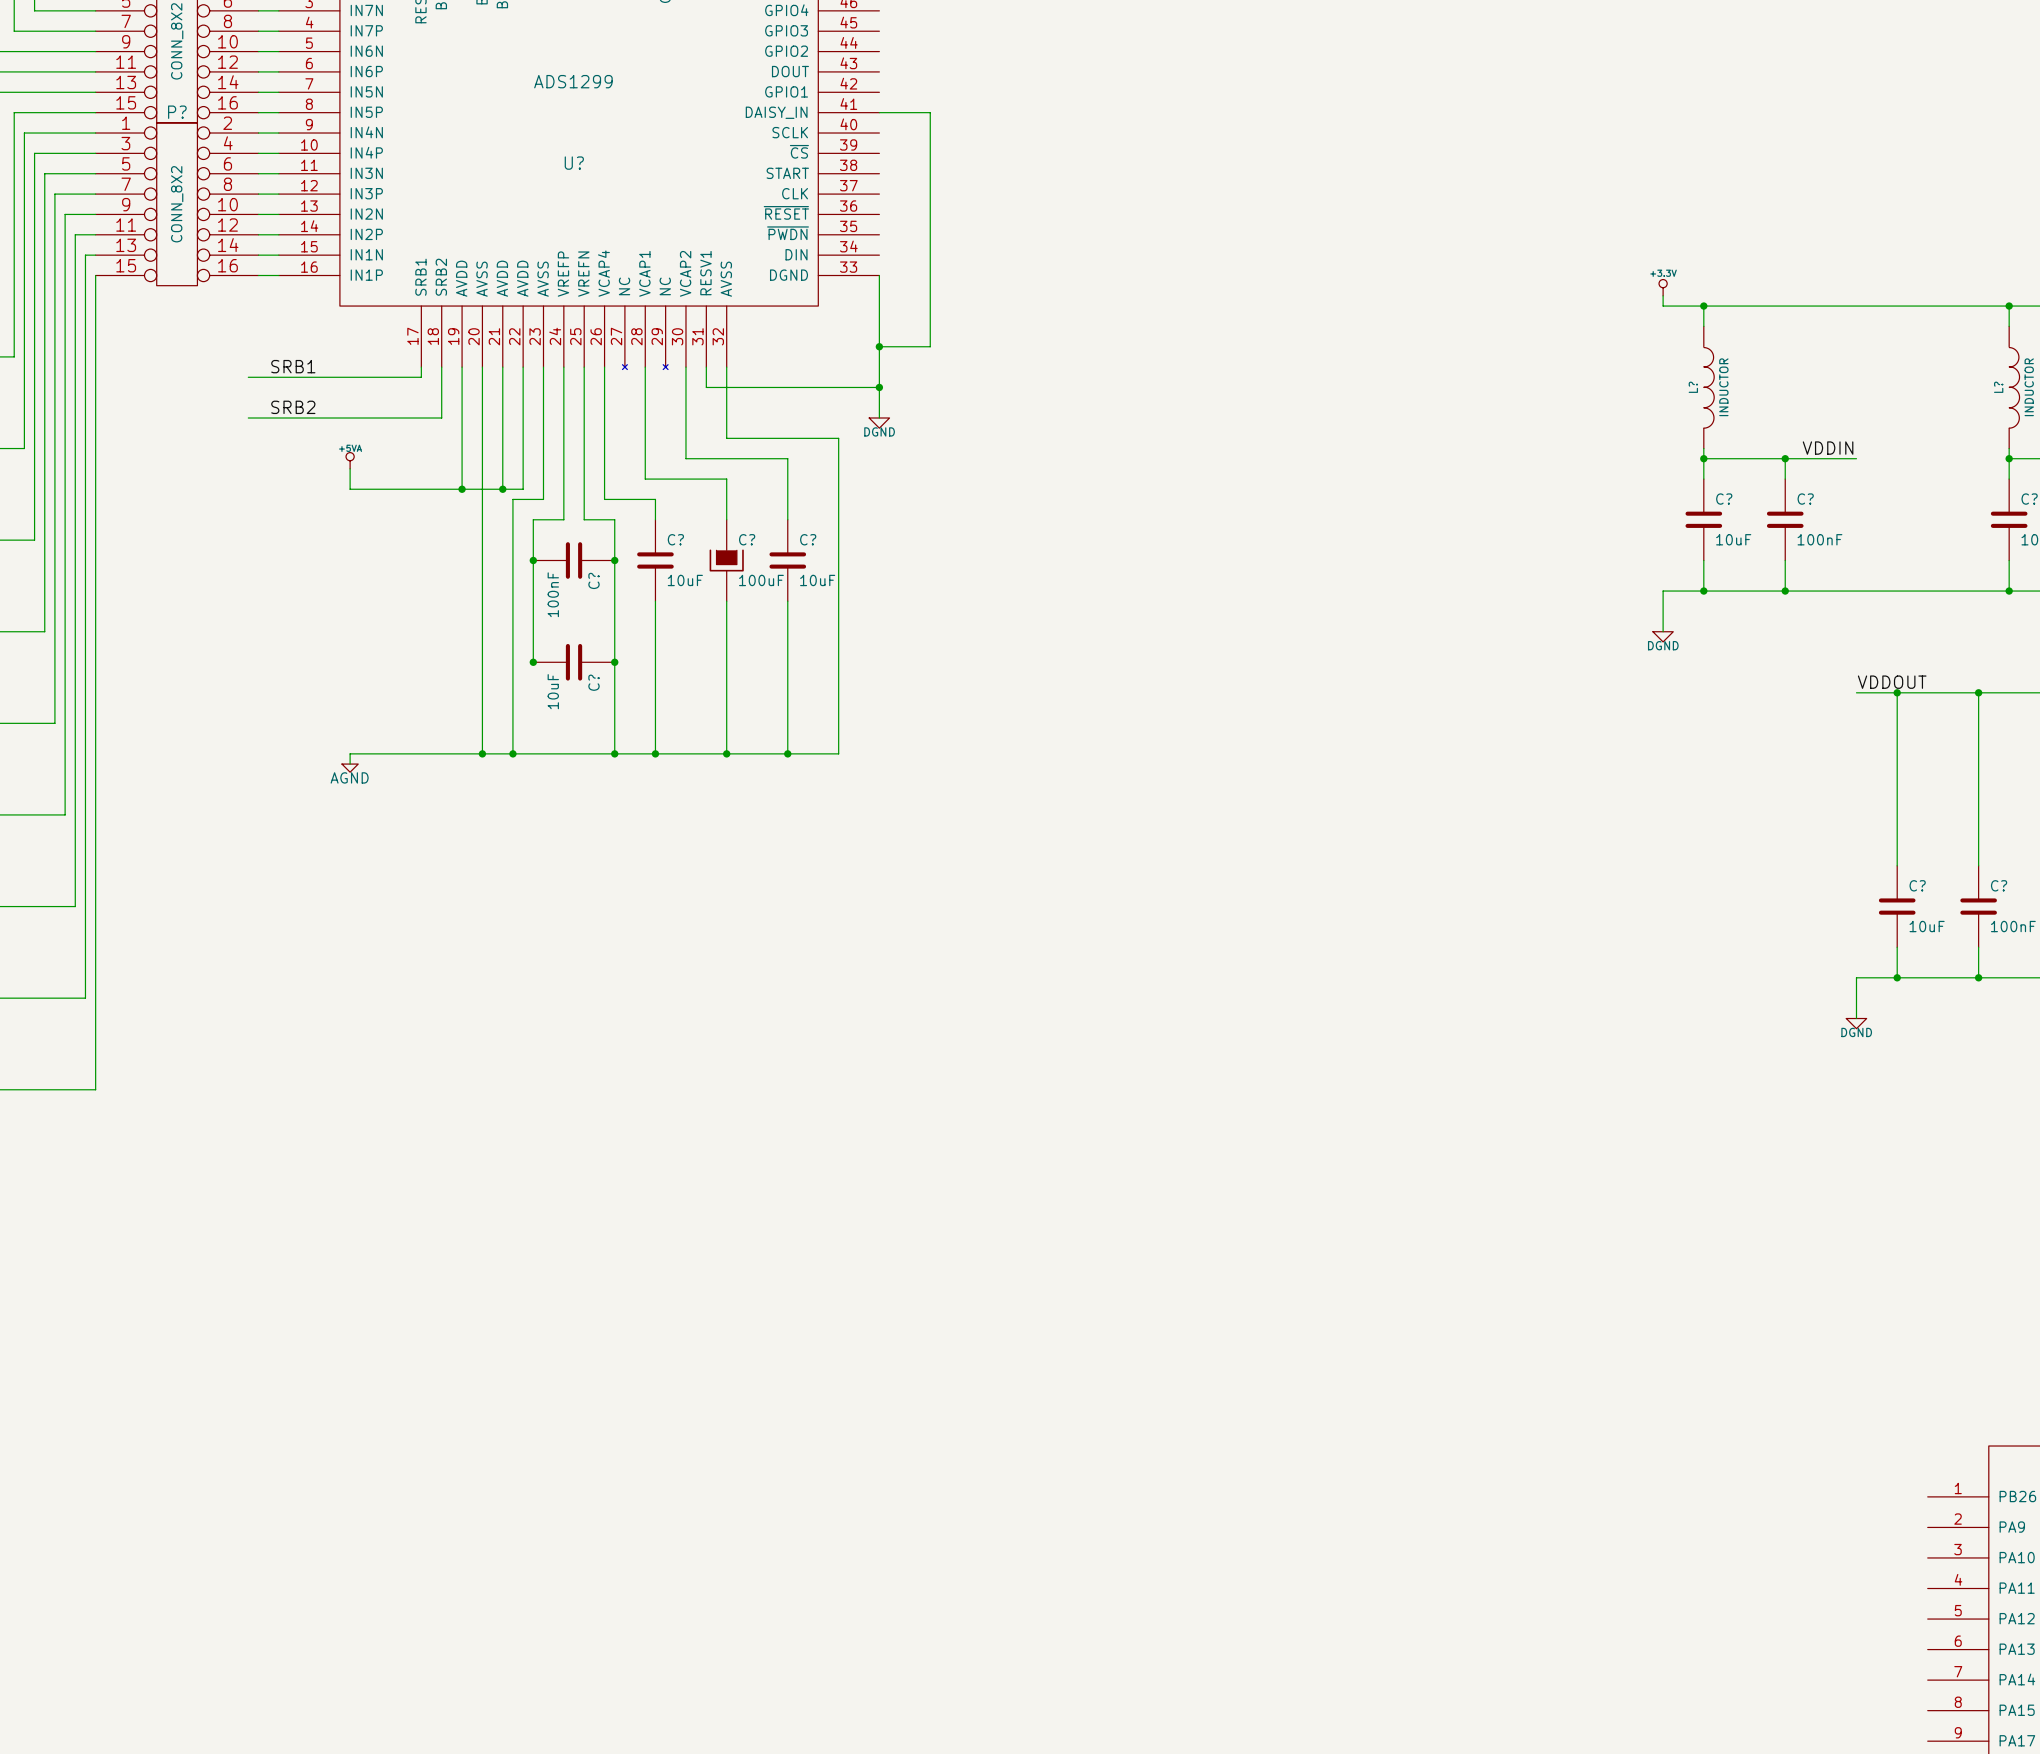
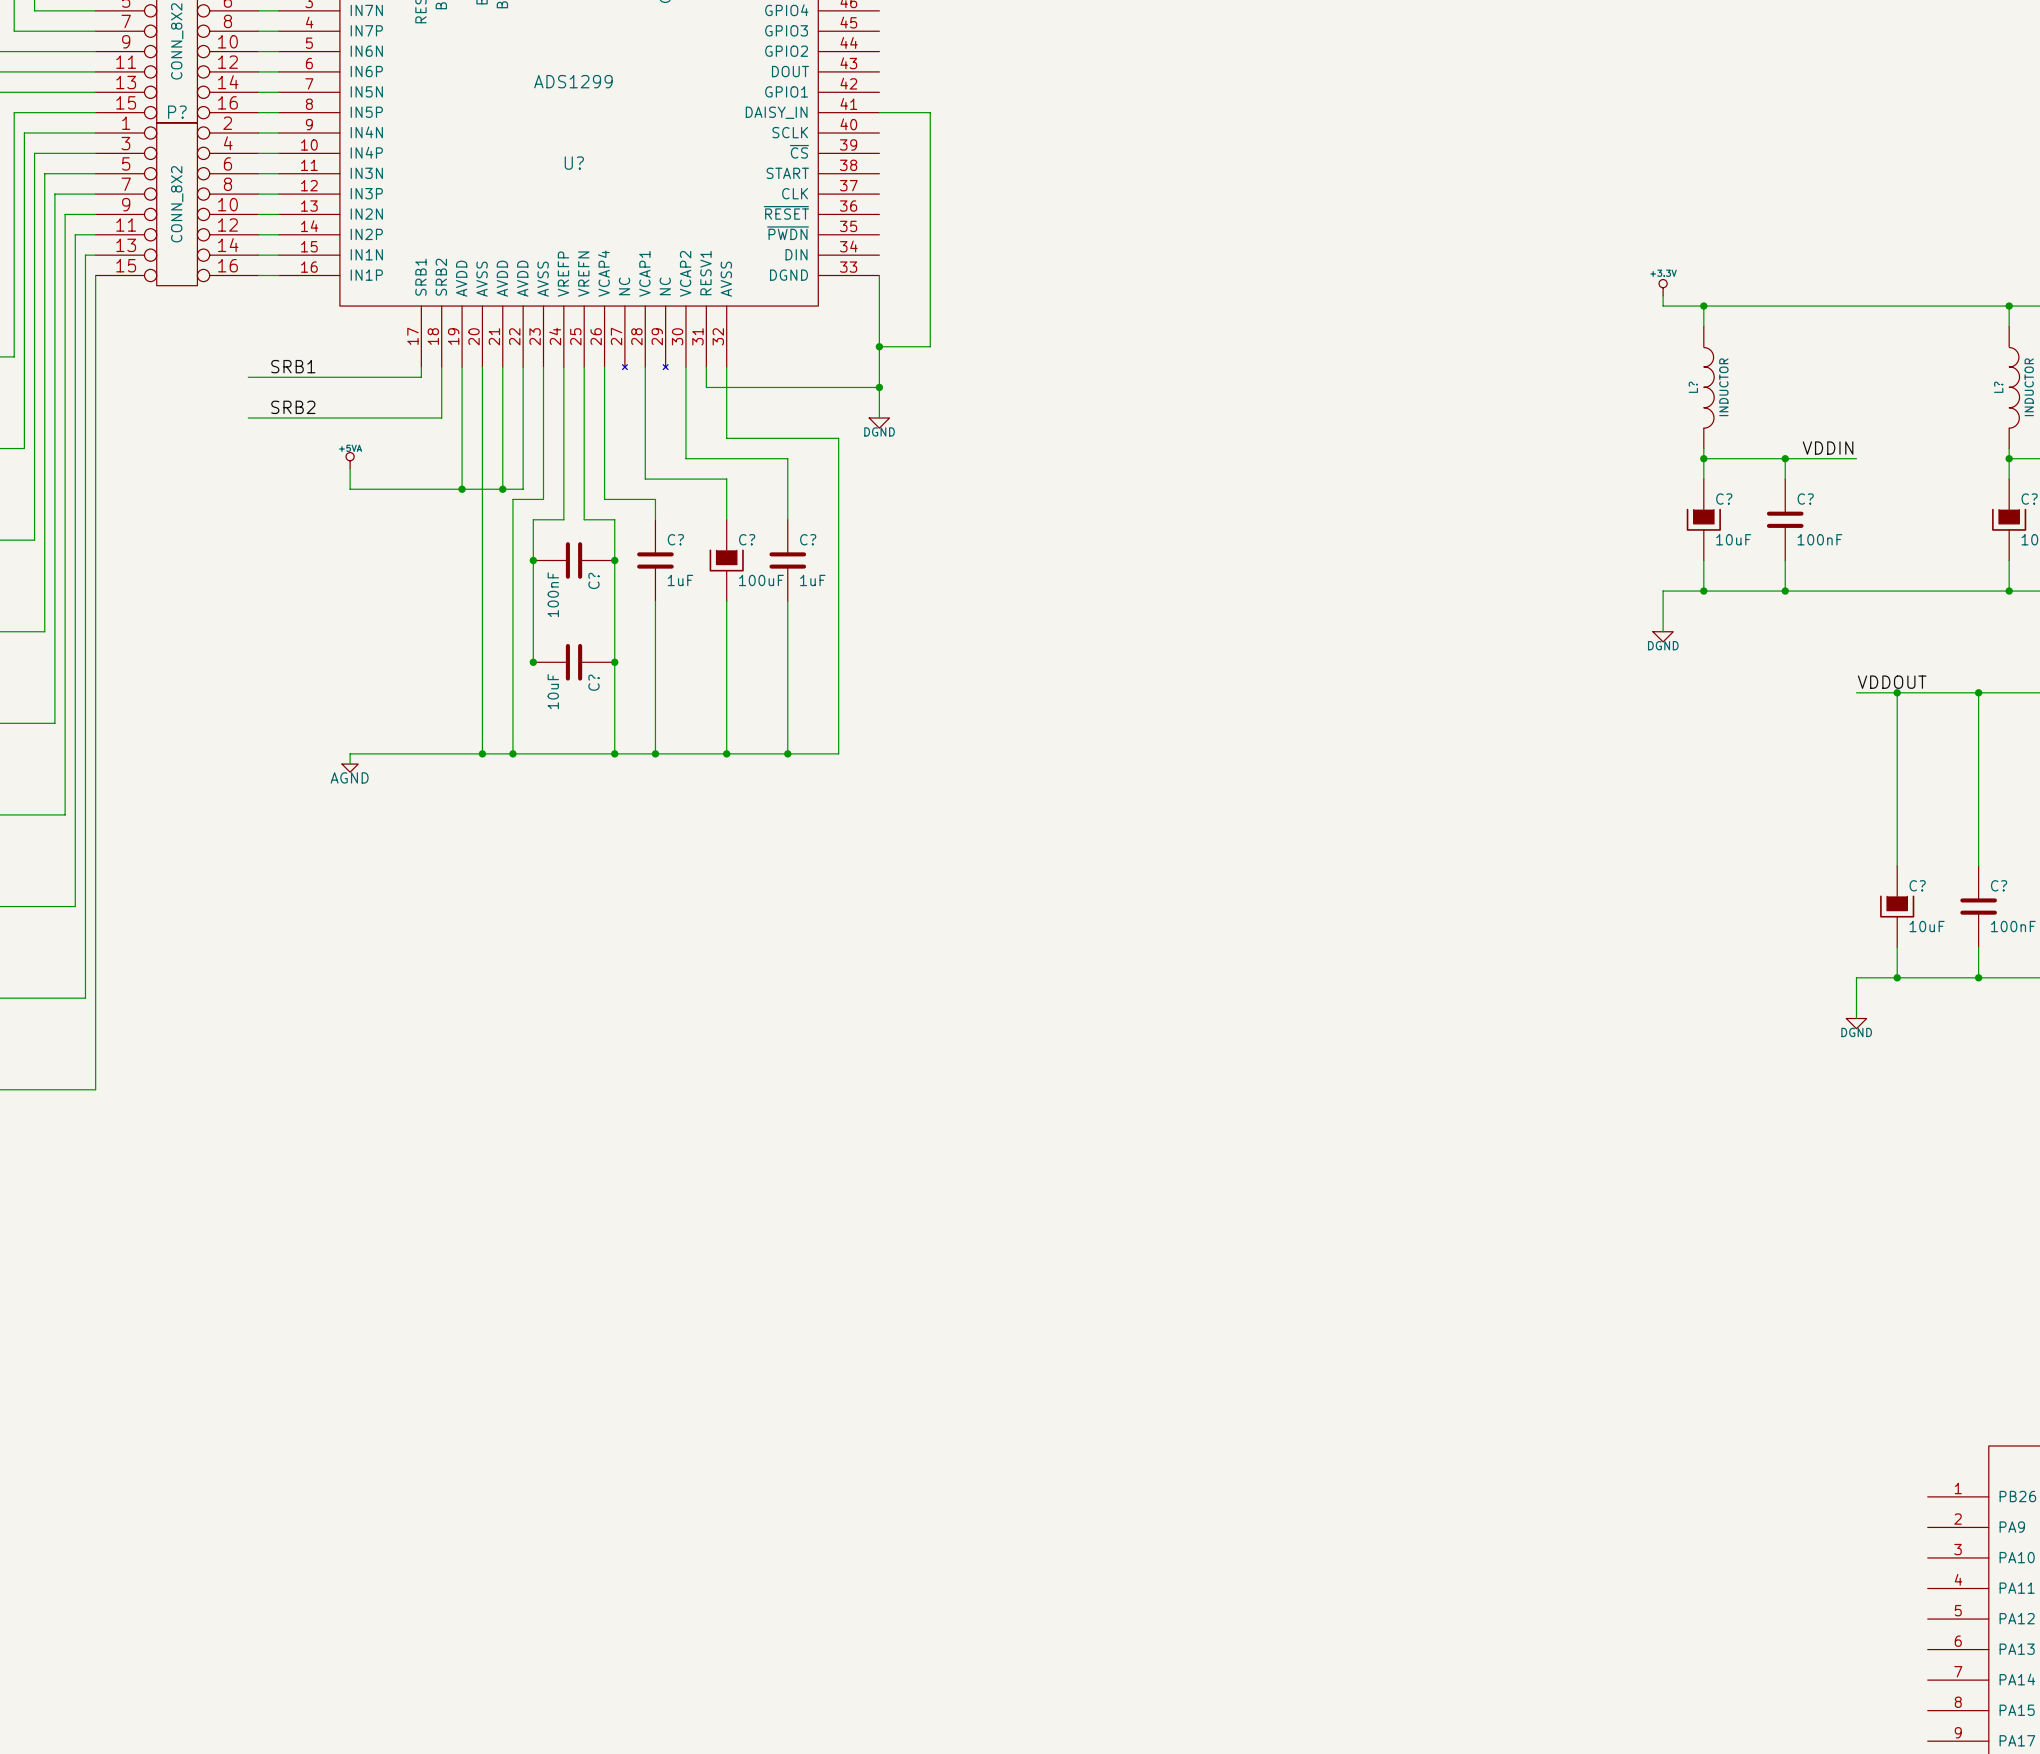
C? symbol: [1685, 479, 1723, 561] -> [1686, 479, 1721, 561]
C? symbol: [1990, 479, 2028, 561] -> [1992, 479, 2027, 561]
C? value: 10uF (685, 580) -> 1uF (680, 580)
C? value: 10uF (817, 580) -> 1uF (812, 580)
C? symbol: [1878, 865, 1916, 948] -> [1880, 865, 1915, 948]

